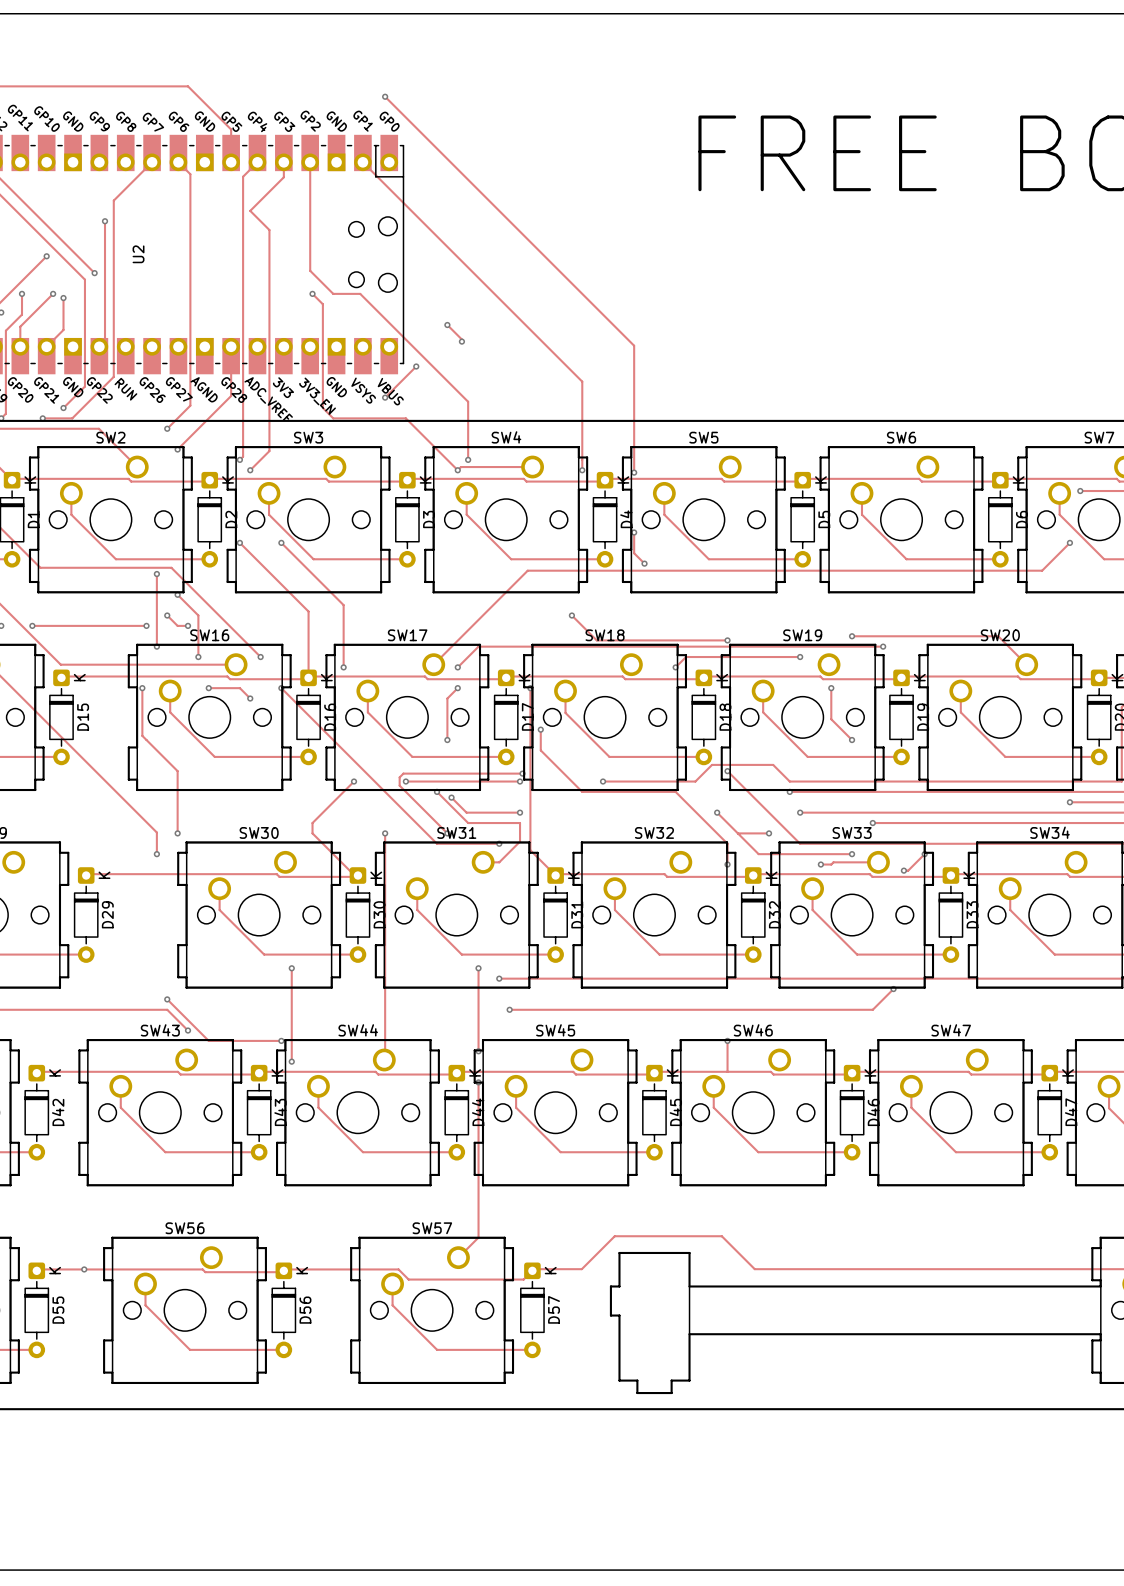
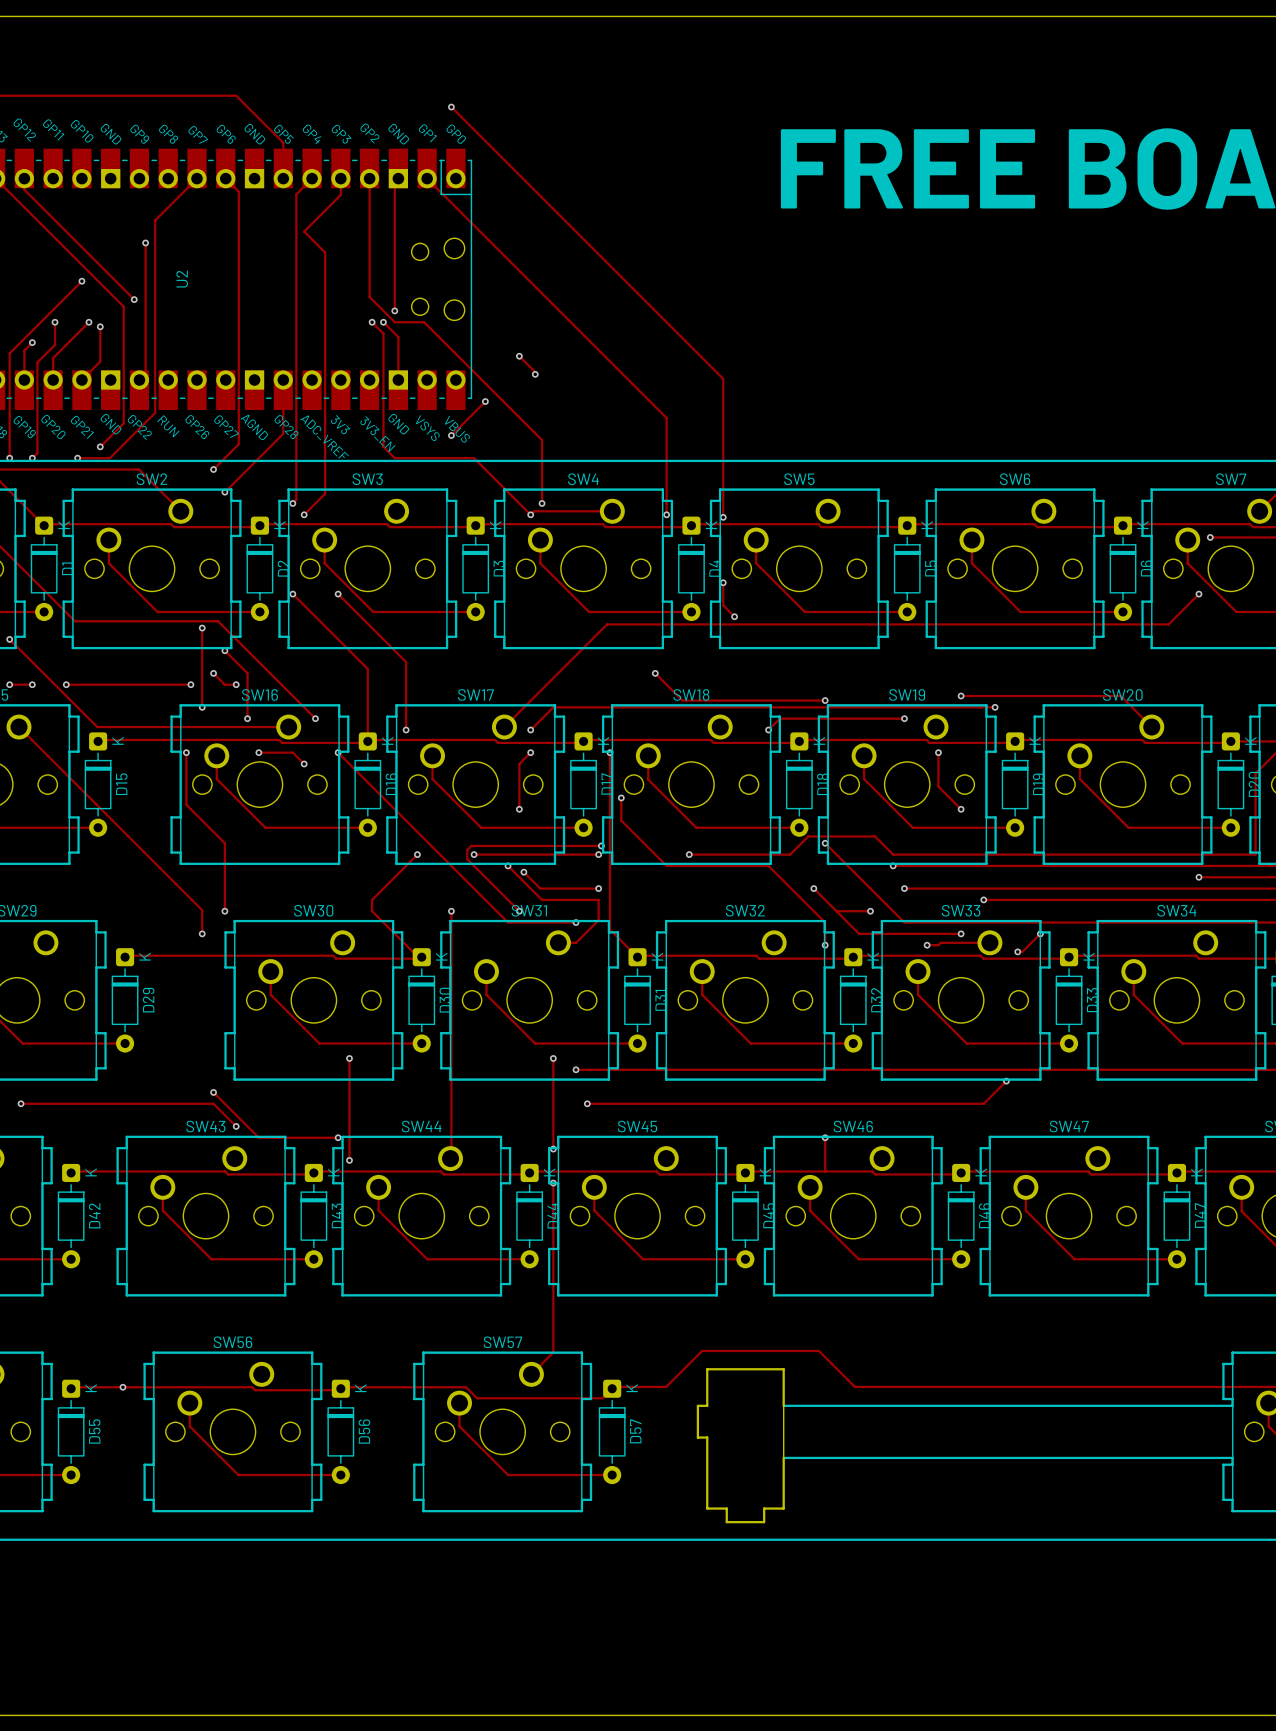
track: none -> (398, 178) (394, 182) (394, 310)
via: none -> (394, 310)
track: none -> (383, 322) (398, 337) (398, 380)
via: none -> (383, 322)

